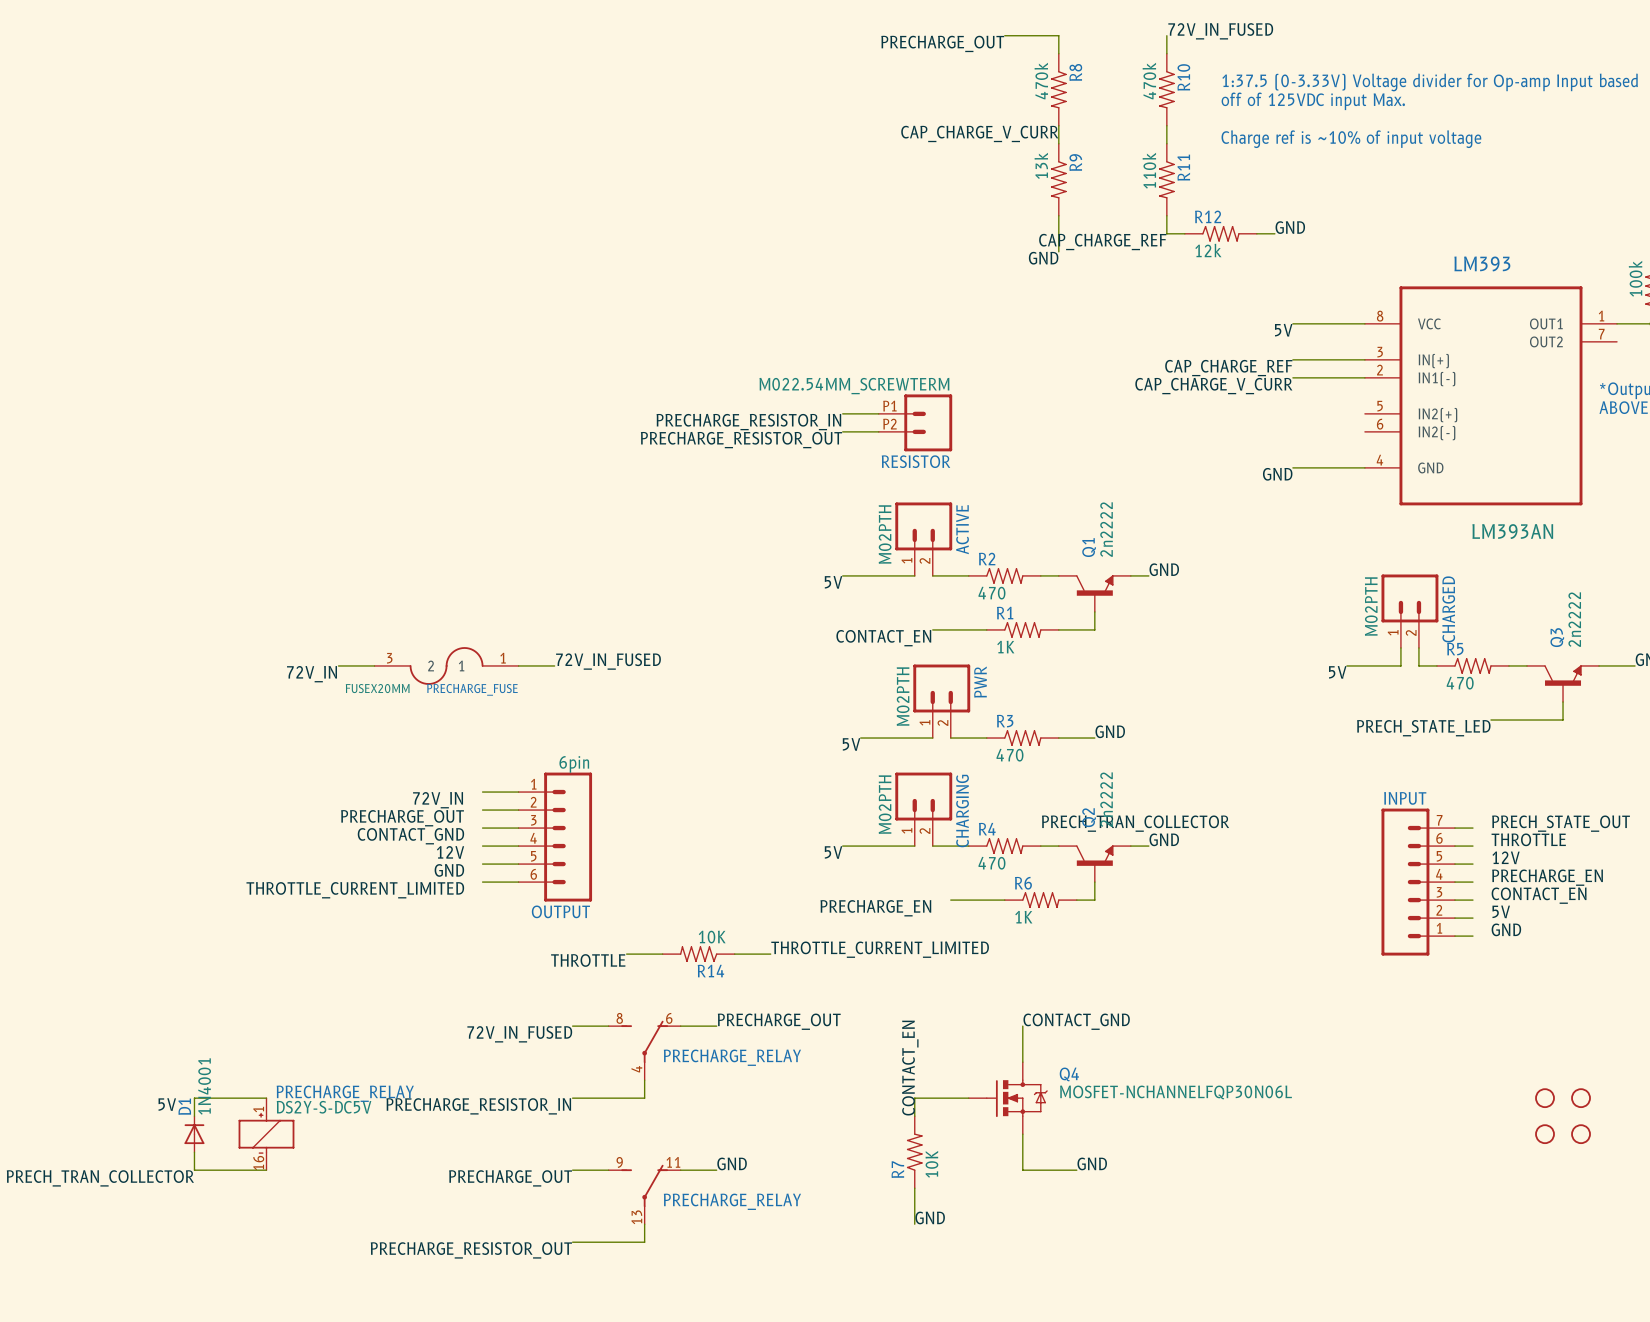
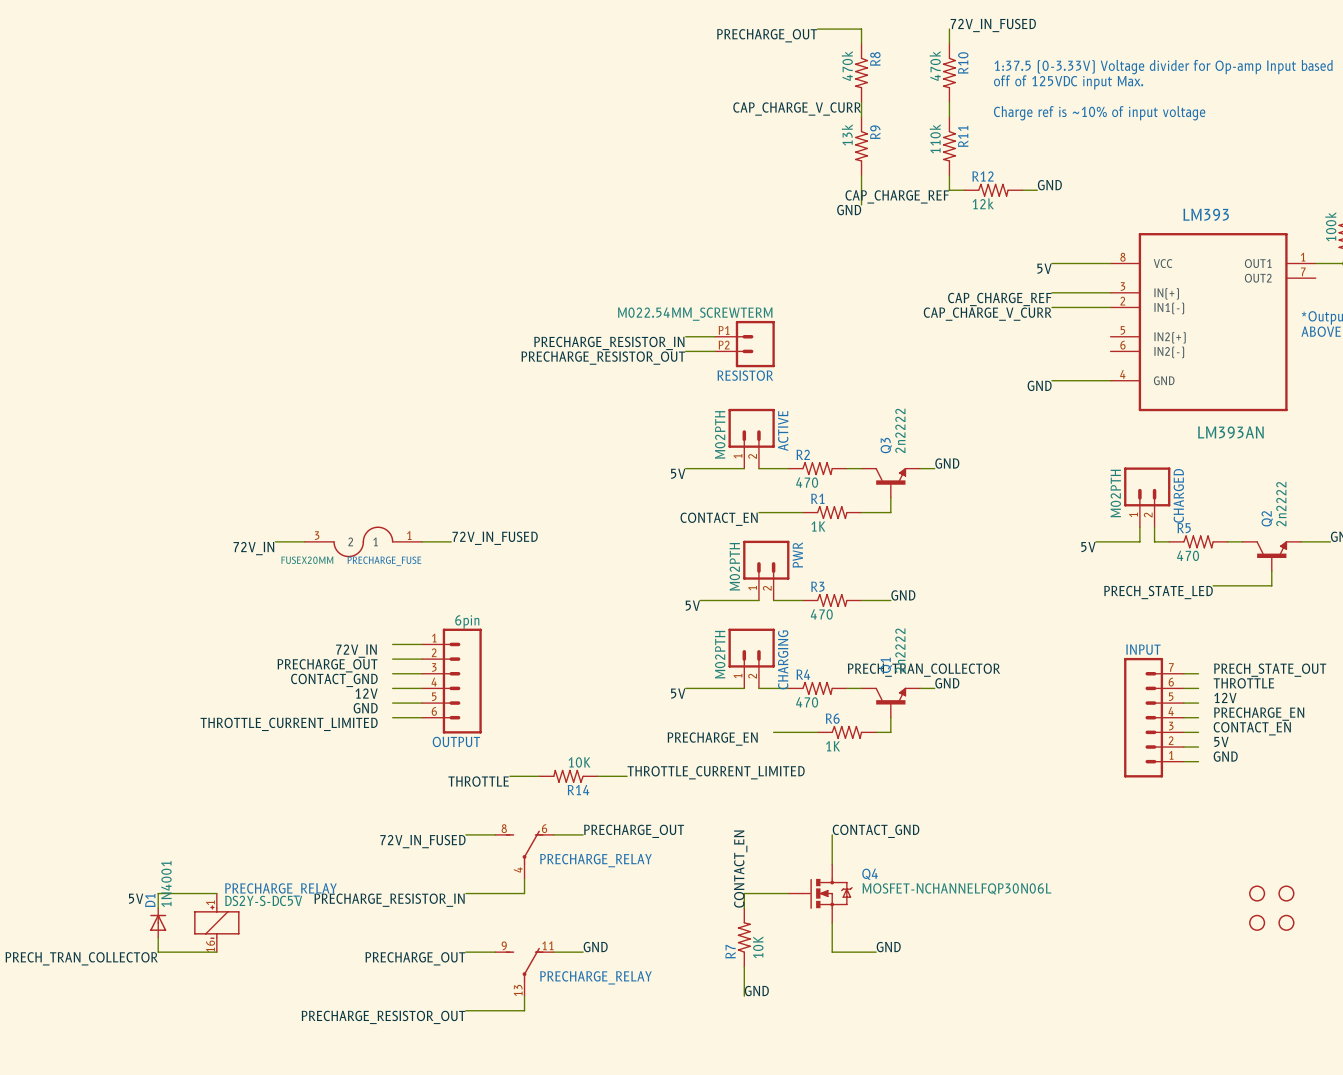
Q1 name: Q1 (1089, 547) -> Q3 (886, 445)
Q3 name: Q3 (1557, 637) -> Q2 (1267, 518)
Q2 name: Q2 (1089, 817) -> Q1 (886, 665)

